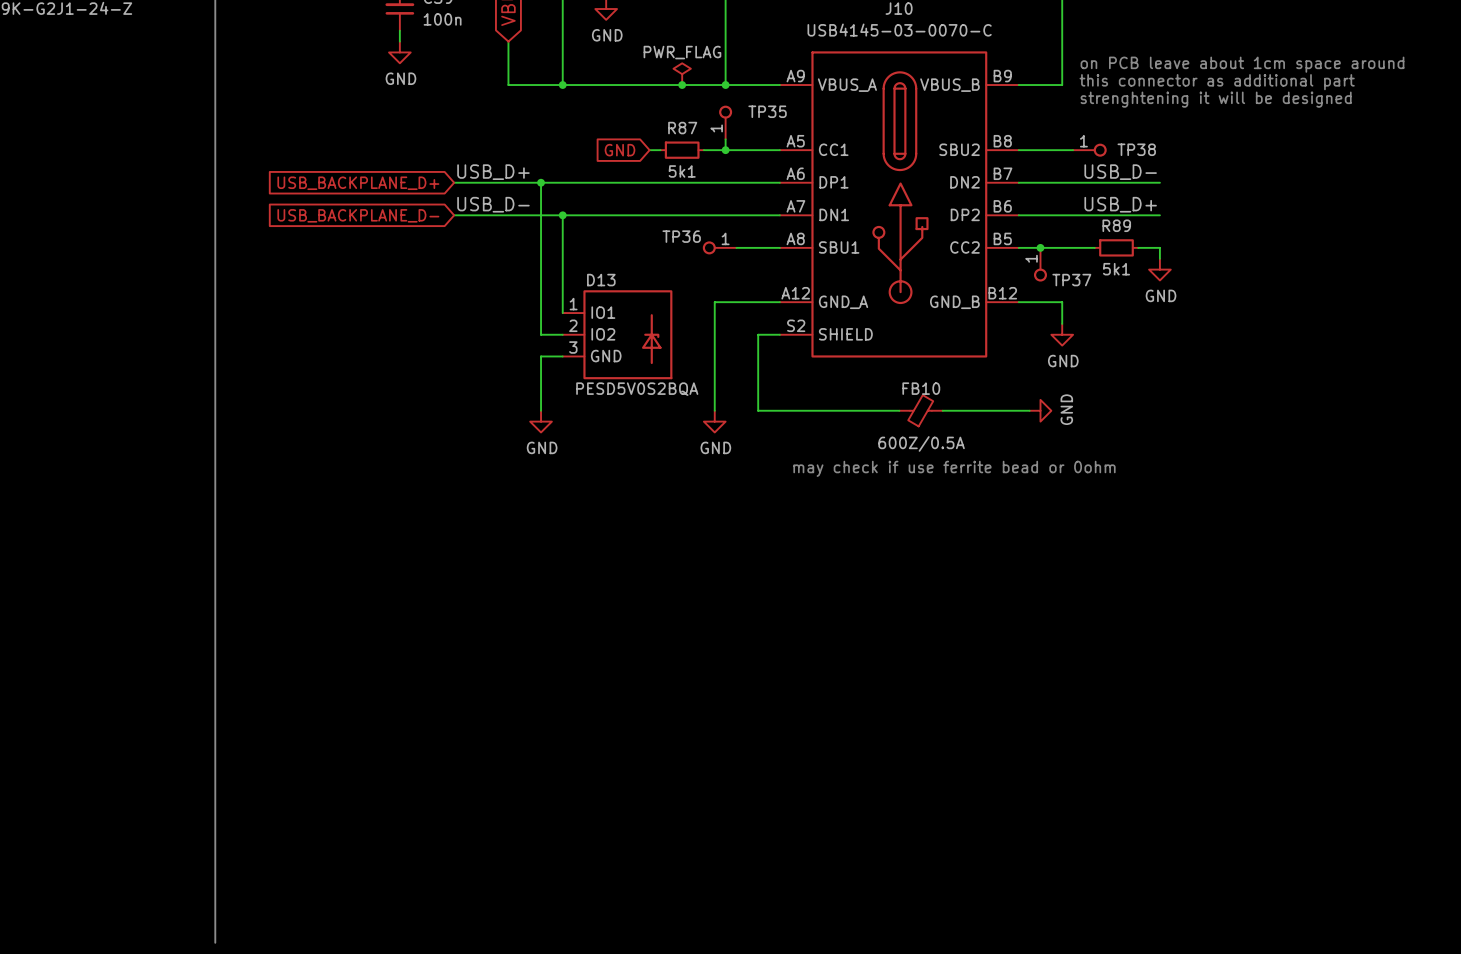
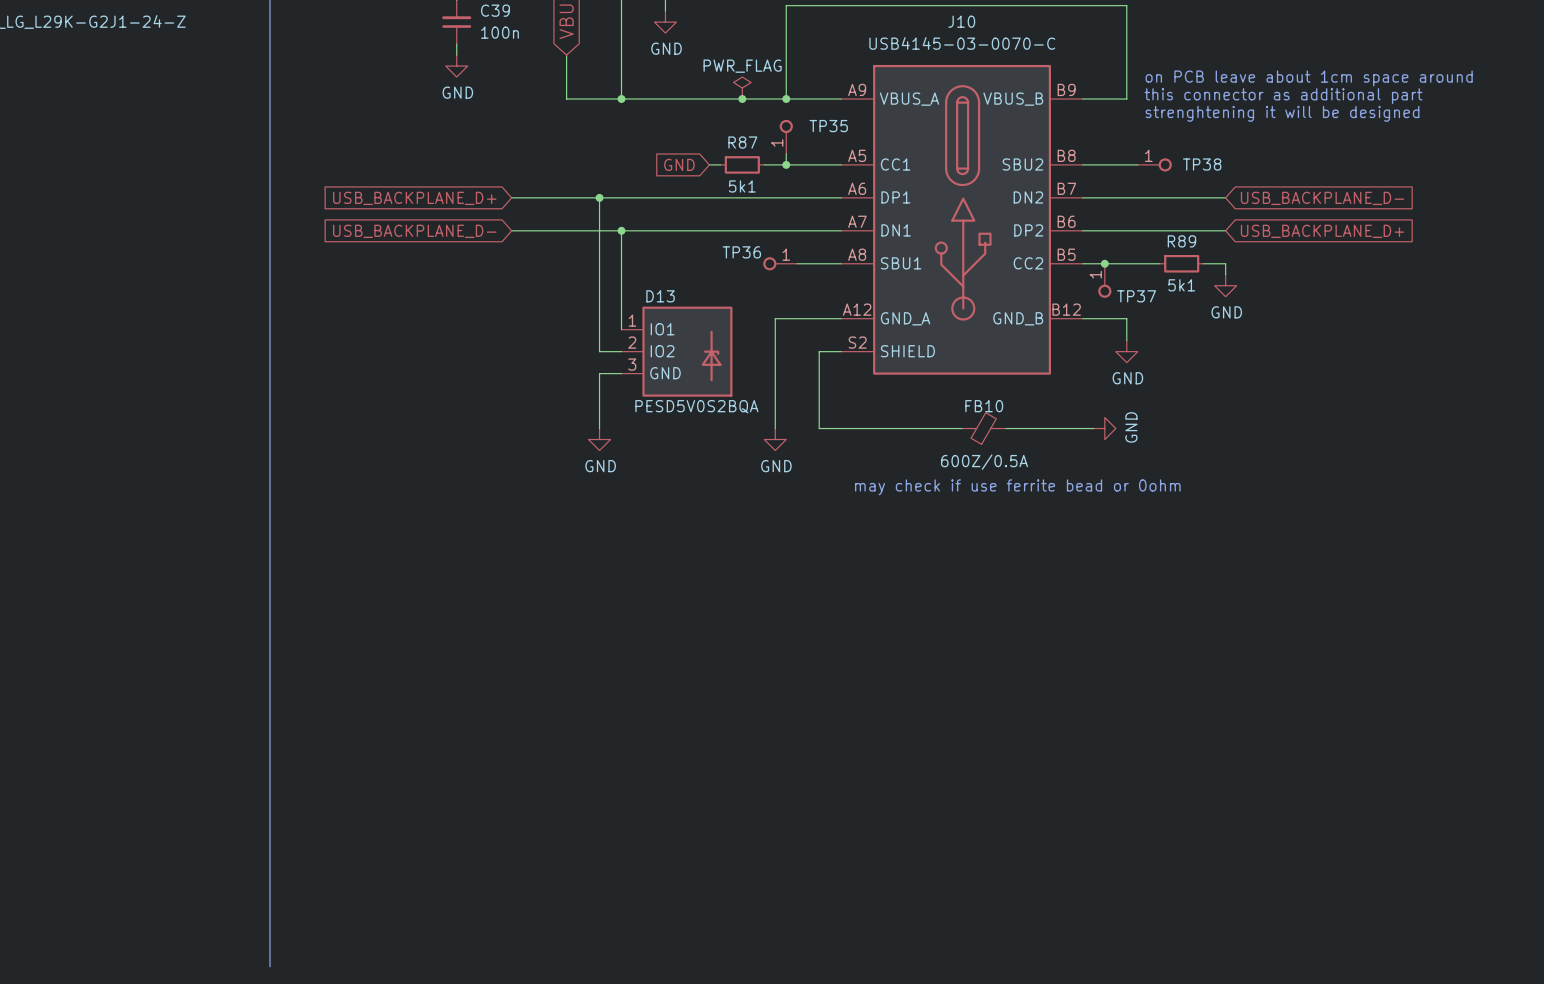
label: USB_D+ (493, 172) -> none
label: USB_D- (1120, 172) -> none
global label: none -> USB_BACKPLANE_D- (1322, 198)
label: USB_D- (493, 204) -> none
label: USB_D+ (1120, 204) -> none
global label: none -> USB_BACKPLANE_D+ (1322, 231)

